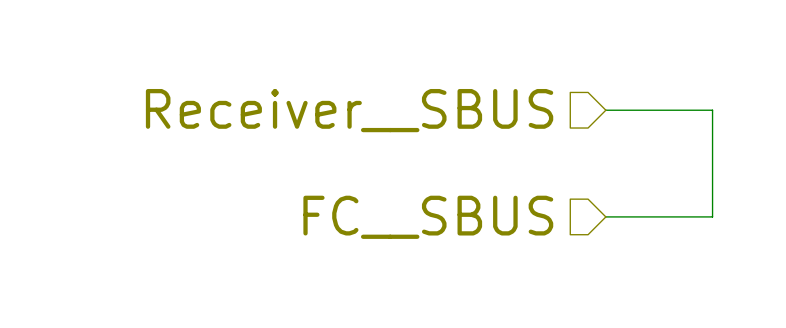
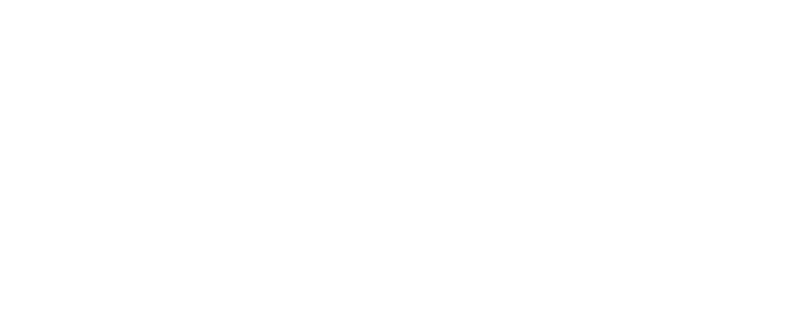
hierarchical label: Receiver__SBUS (349, 110) -> none
wire: (605, 110) (712, 110) (712, 216) (605, 216) -> none
hierarchical label: FC__SBUS (428, 217) -> none

